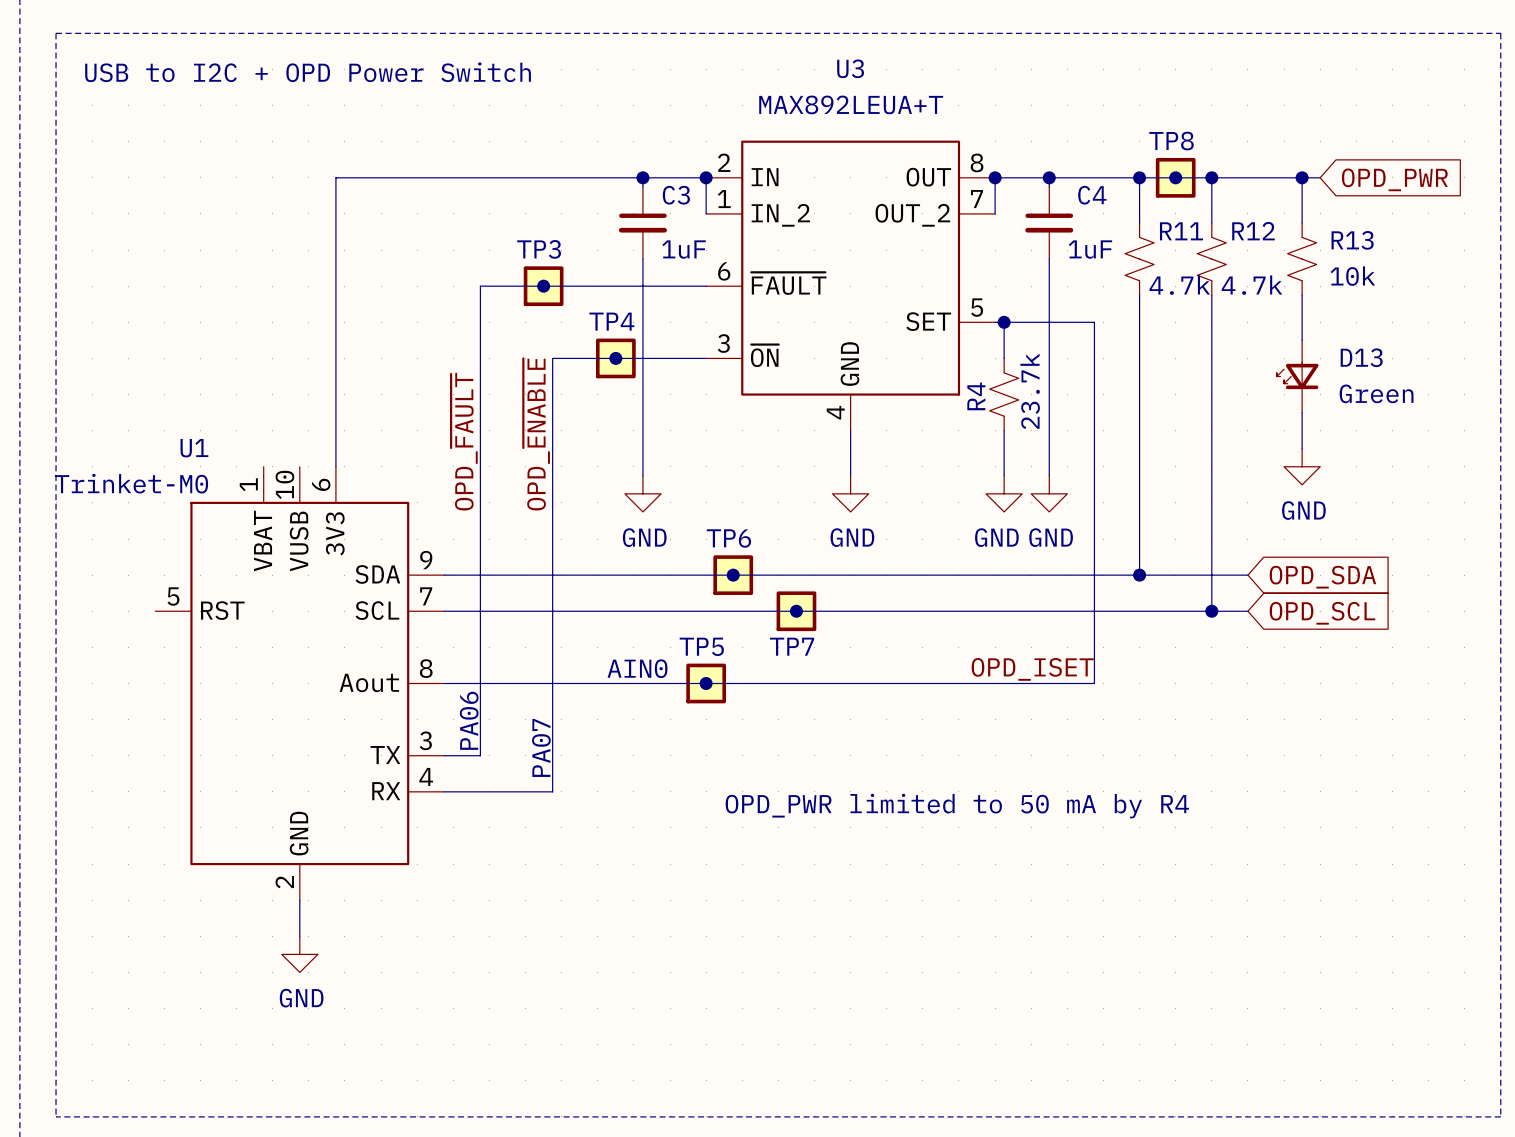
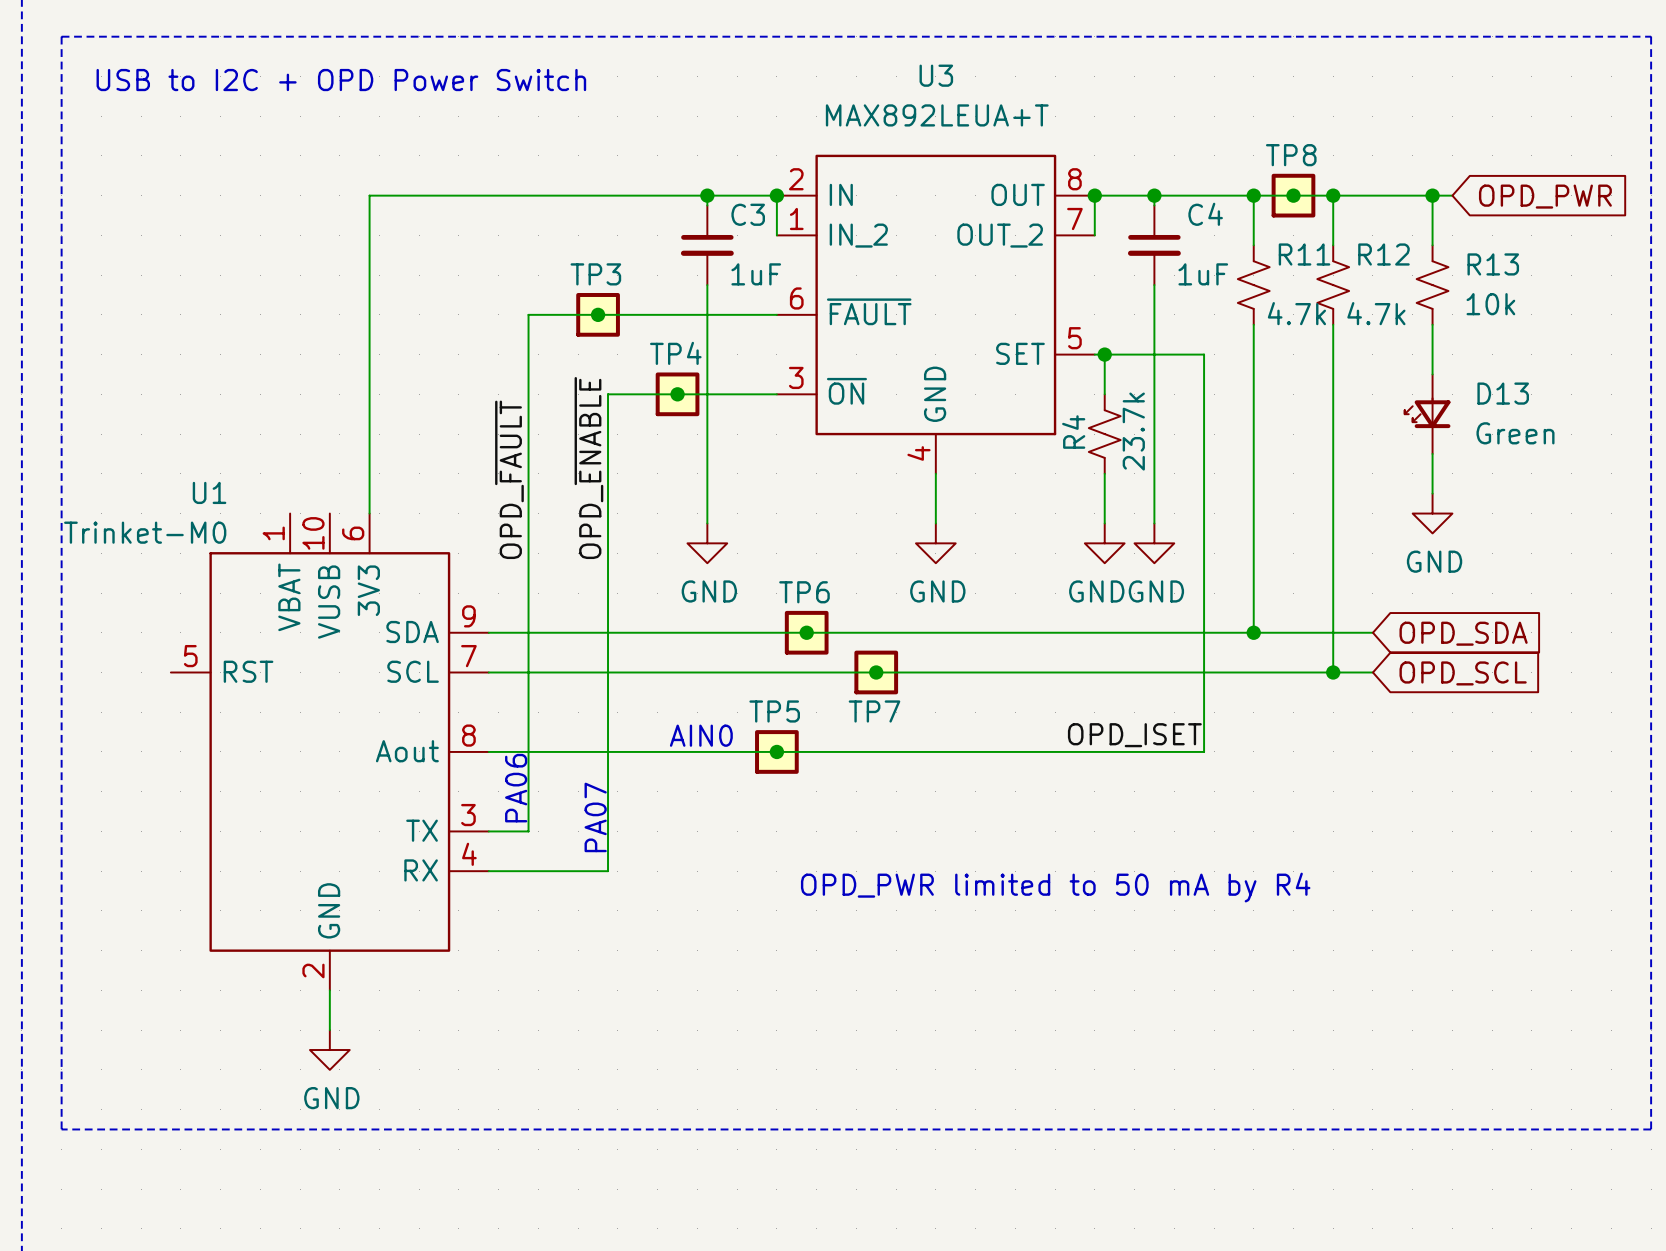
line: (56, 1026) (56, 1116) (1500, 1116) (1500, 1026) -> (61, 1129) (1651, 1129)

